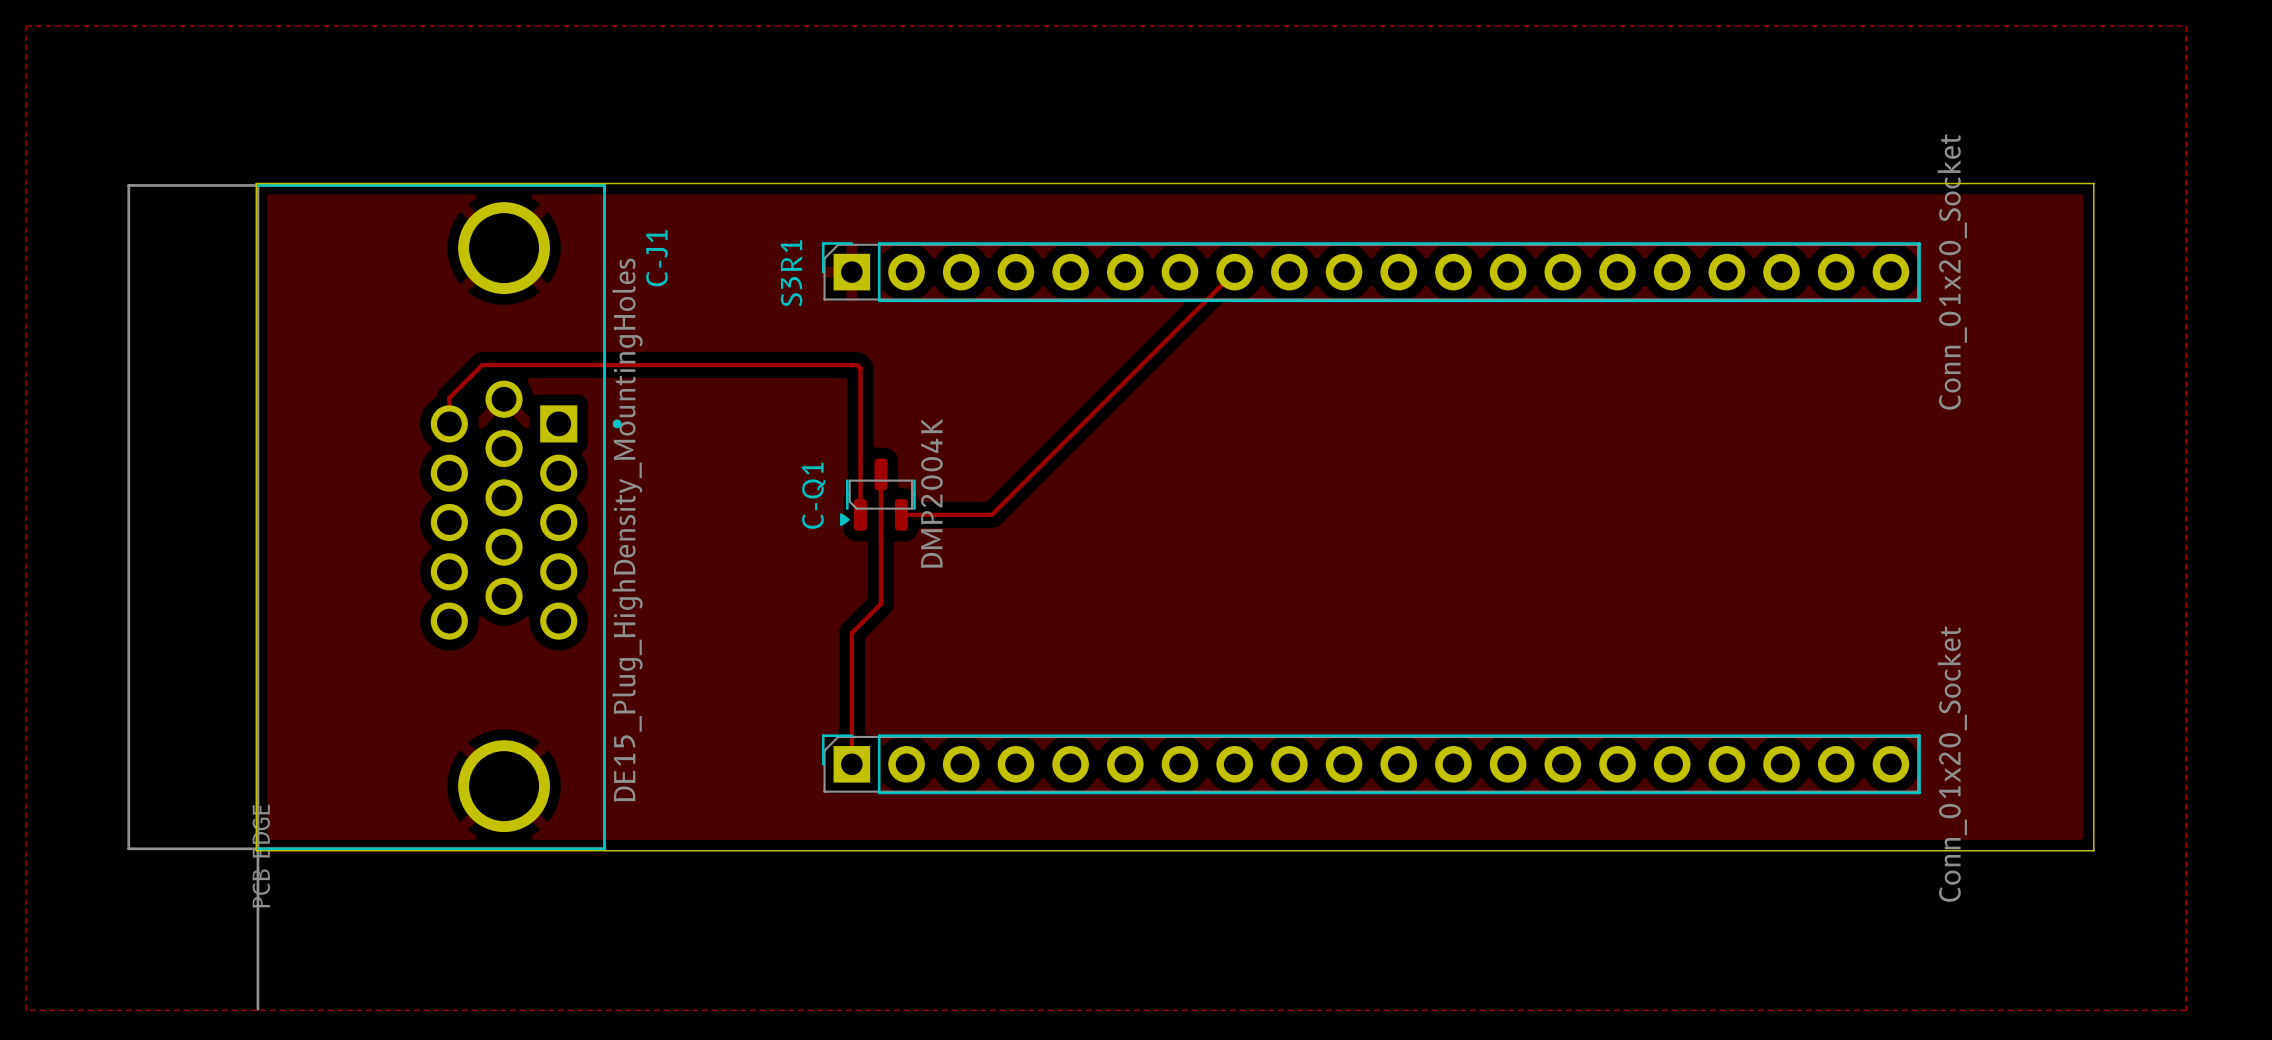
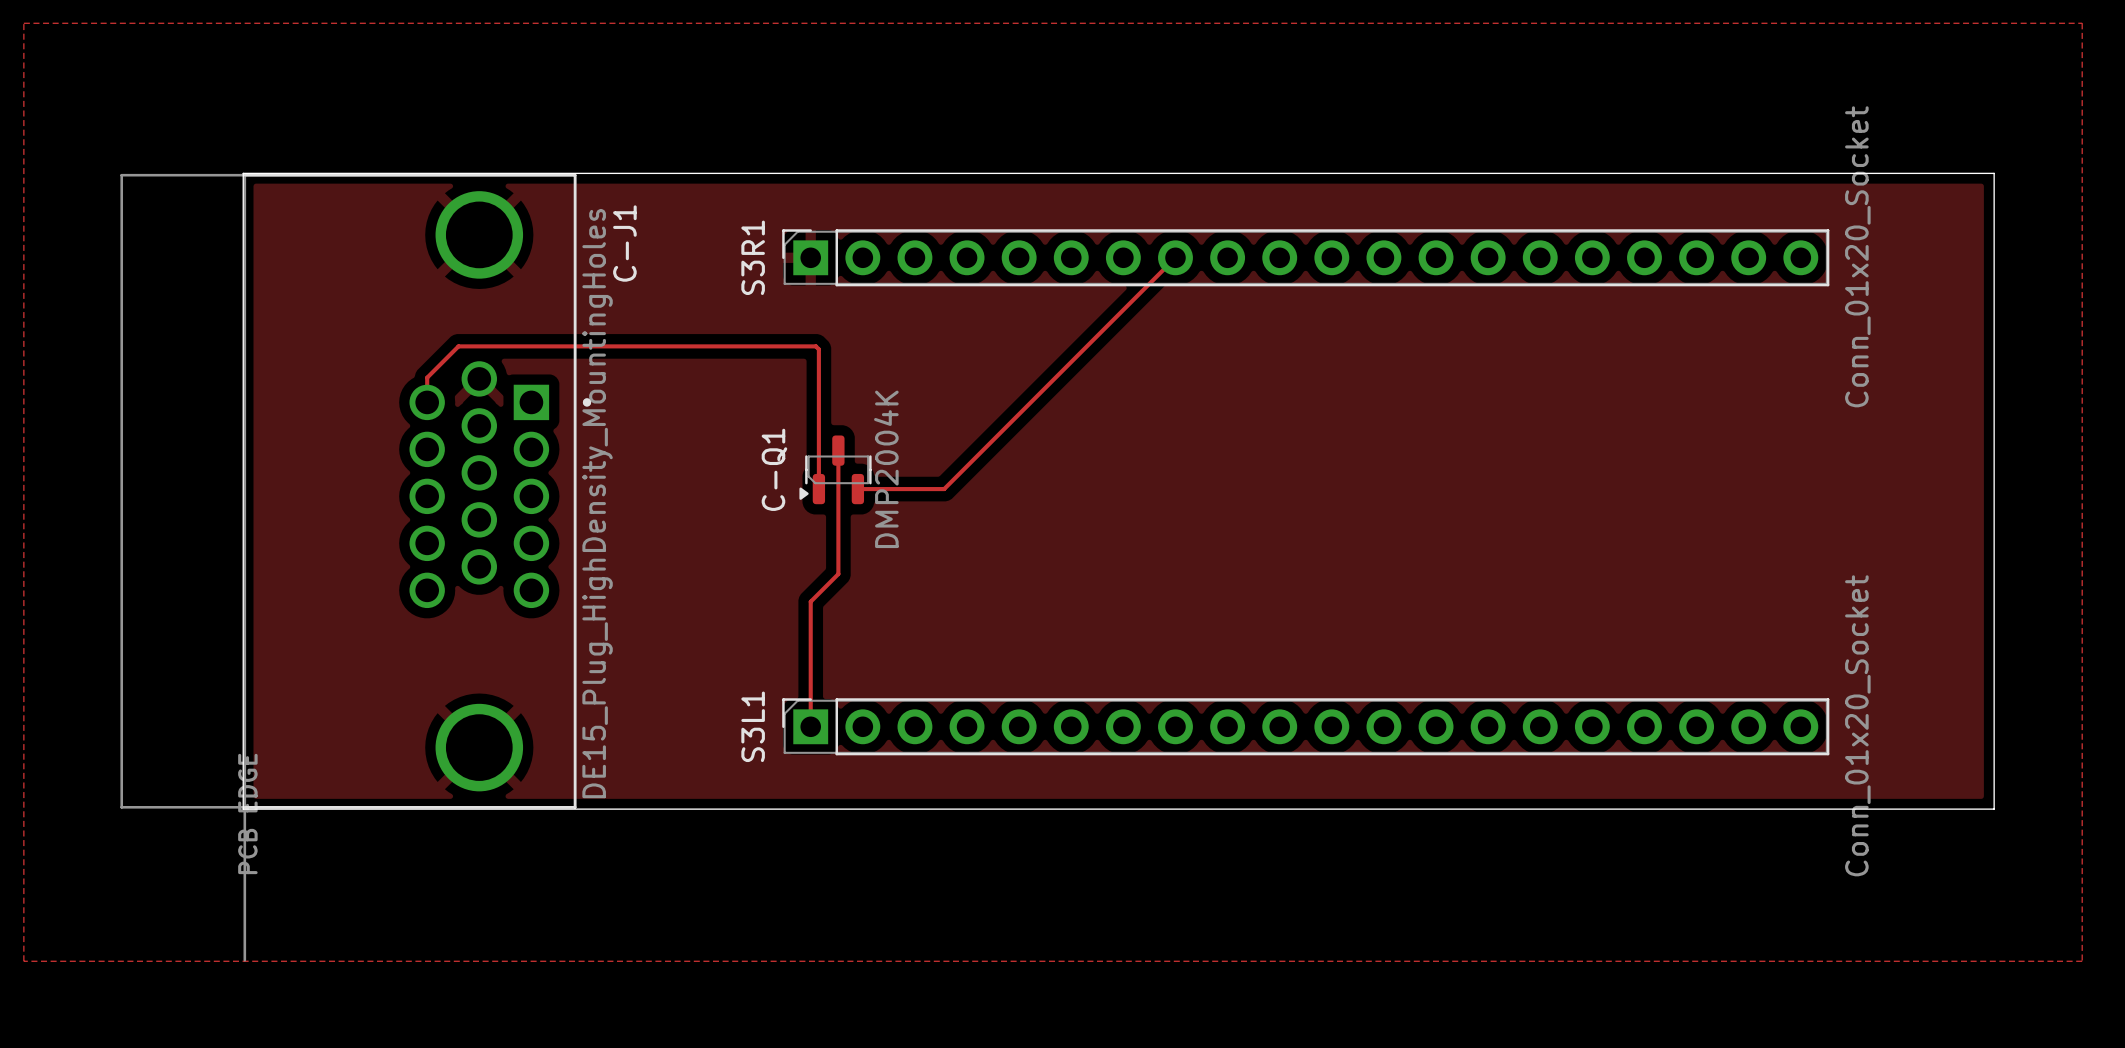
S3L1 name: none -> S3L1 (753, 726)

